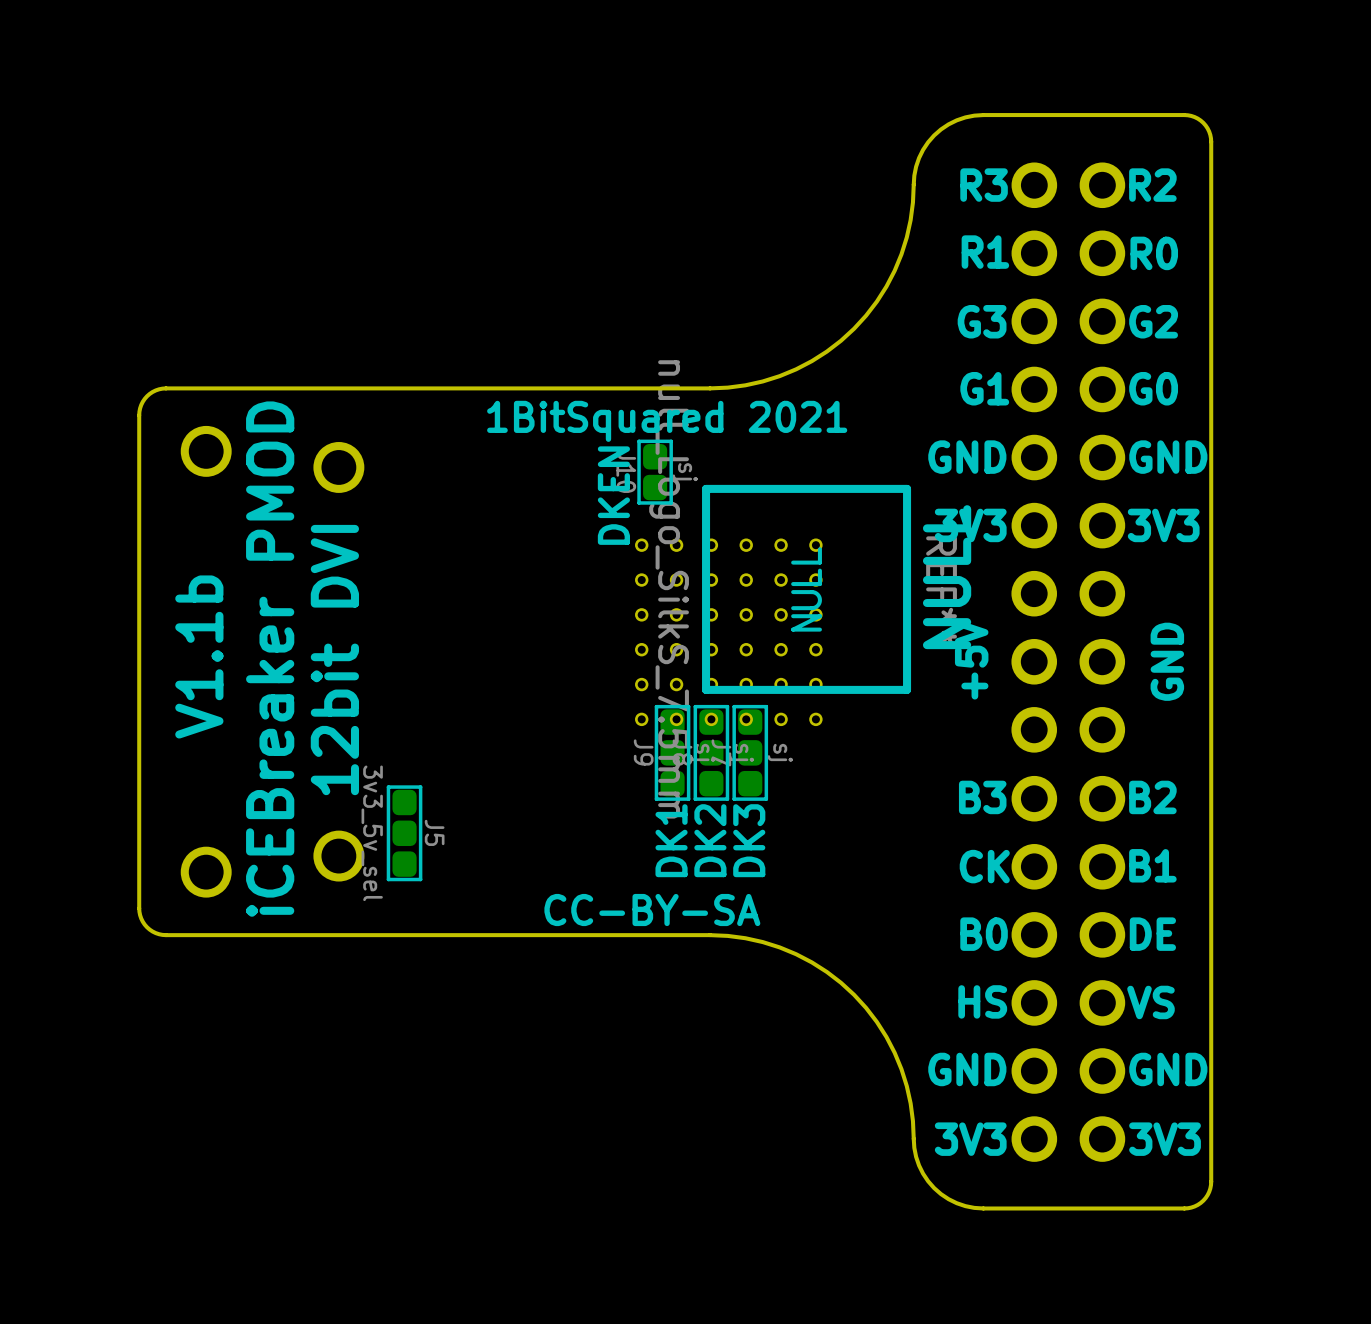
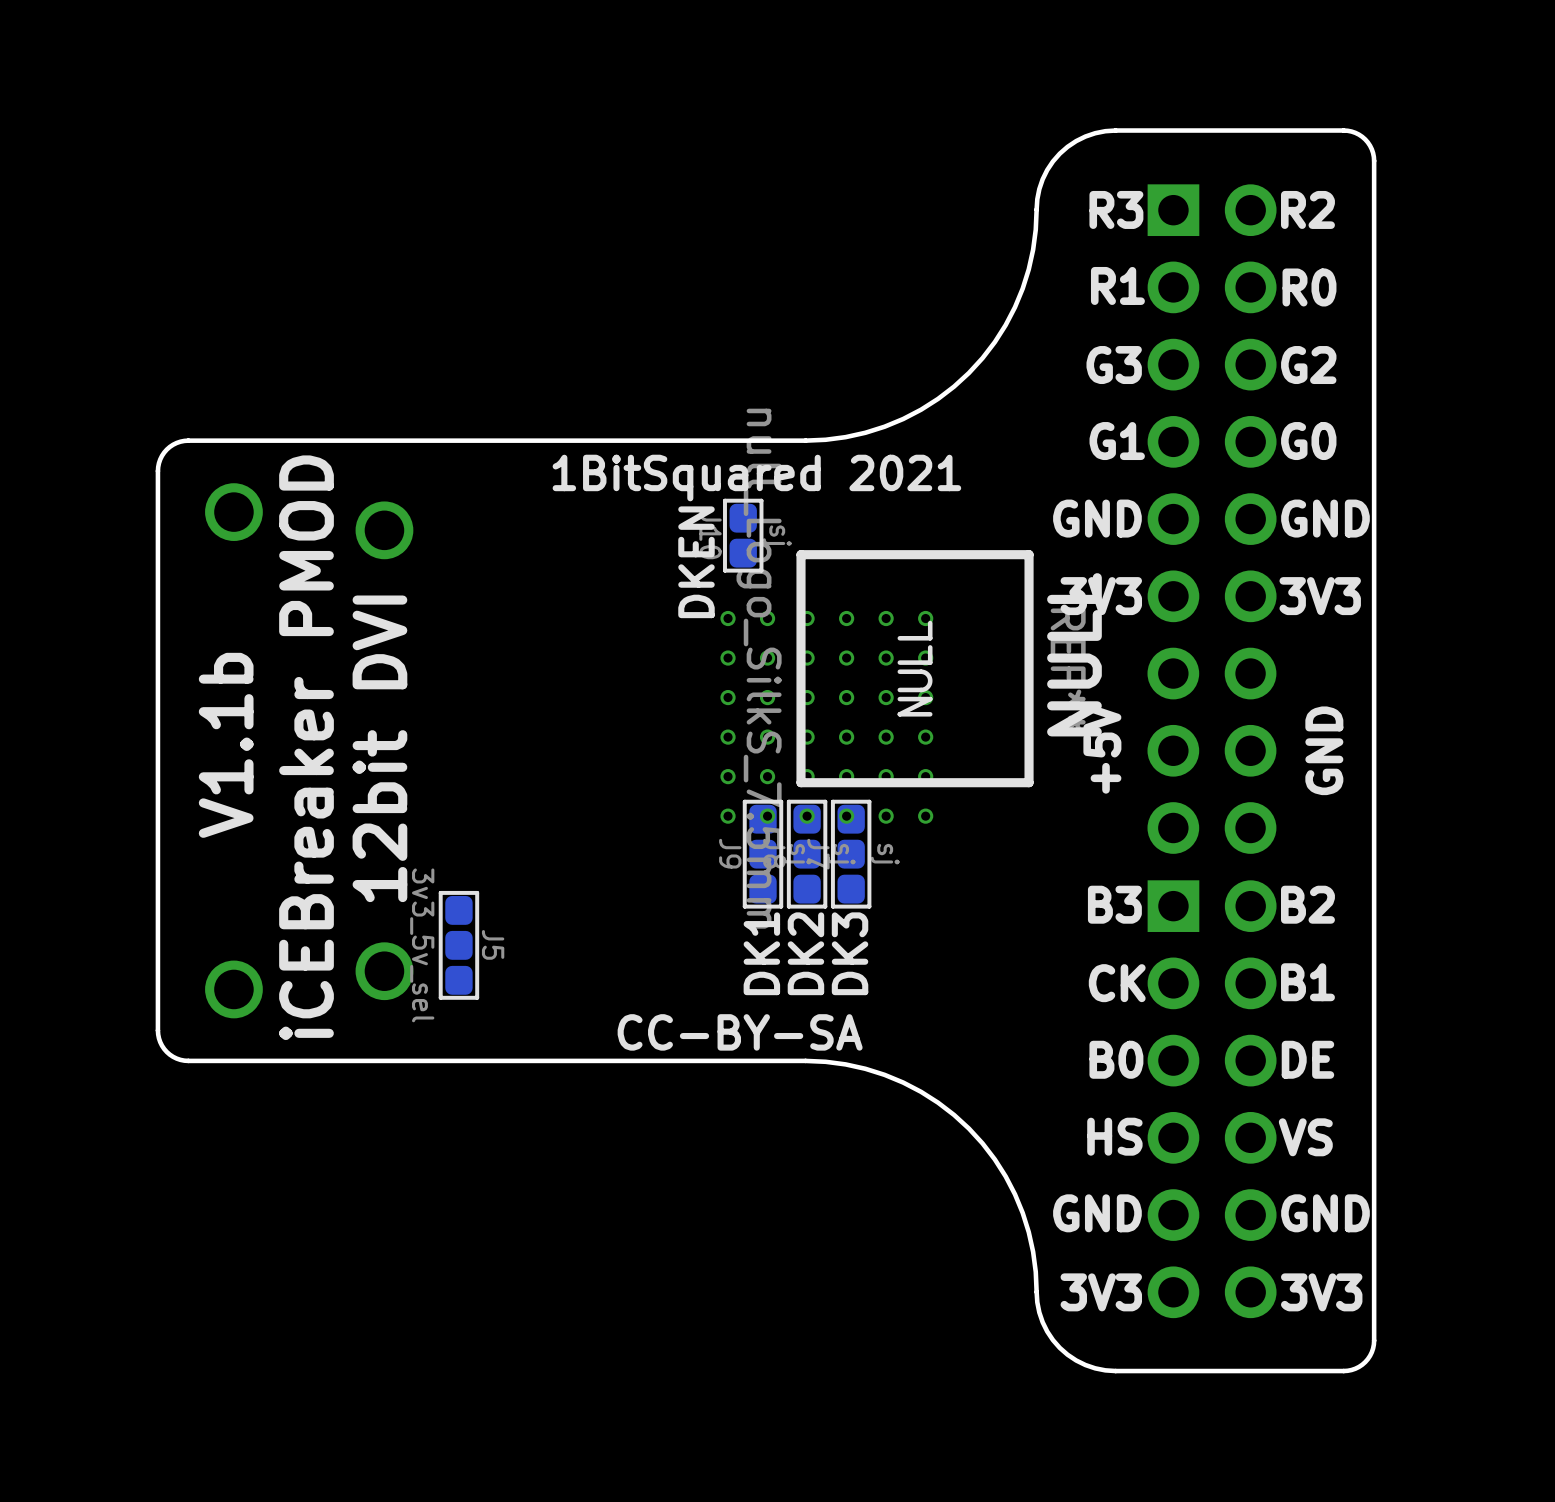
part footprint: [1011, 162, 1126, 549] -> [1147, 184, 1277, 623]
part footprint: [1011, 775, 1126, 1162] -> [1147, 880, 1277, 1319]

